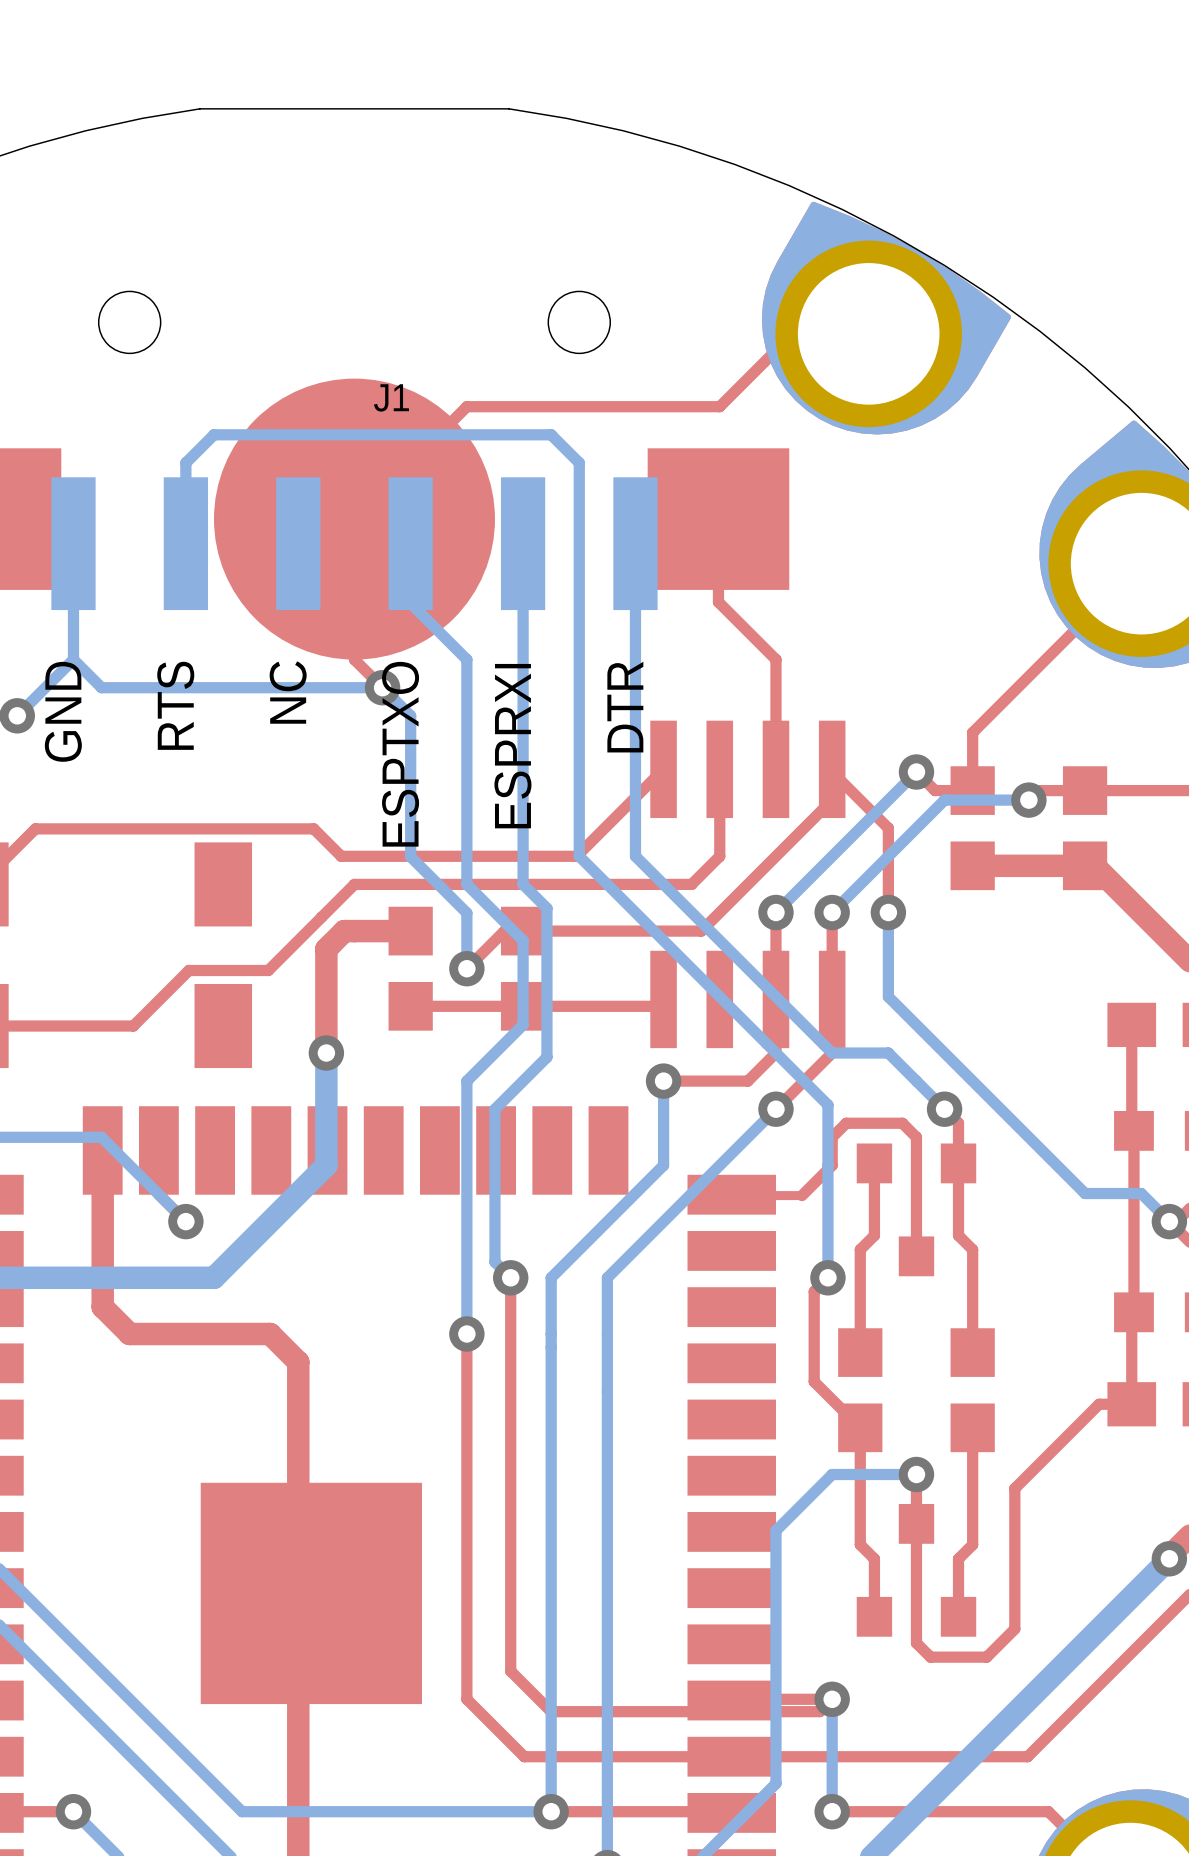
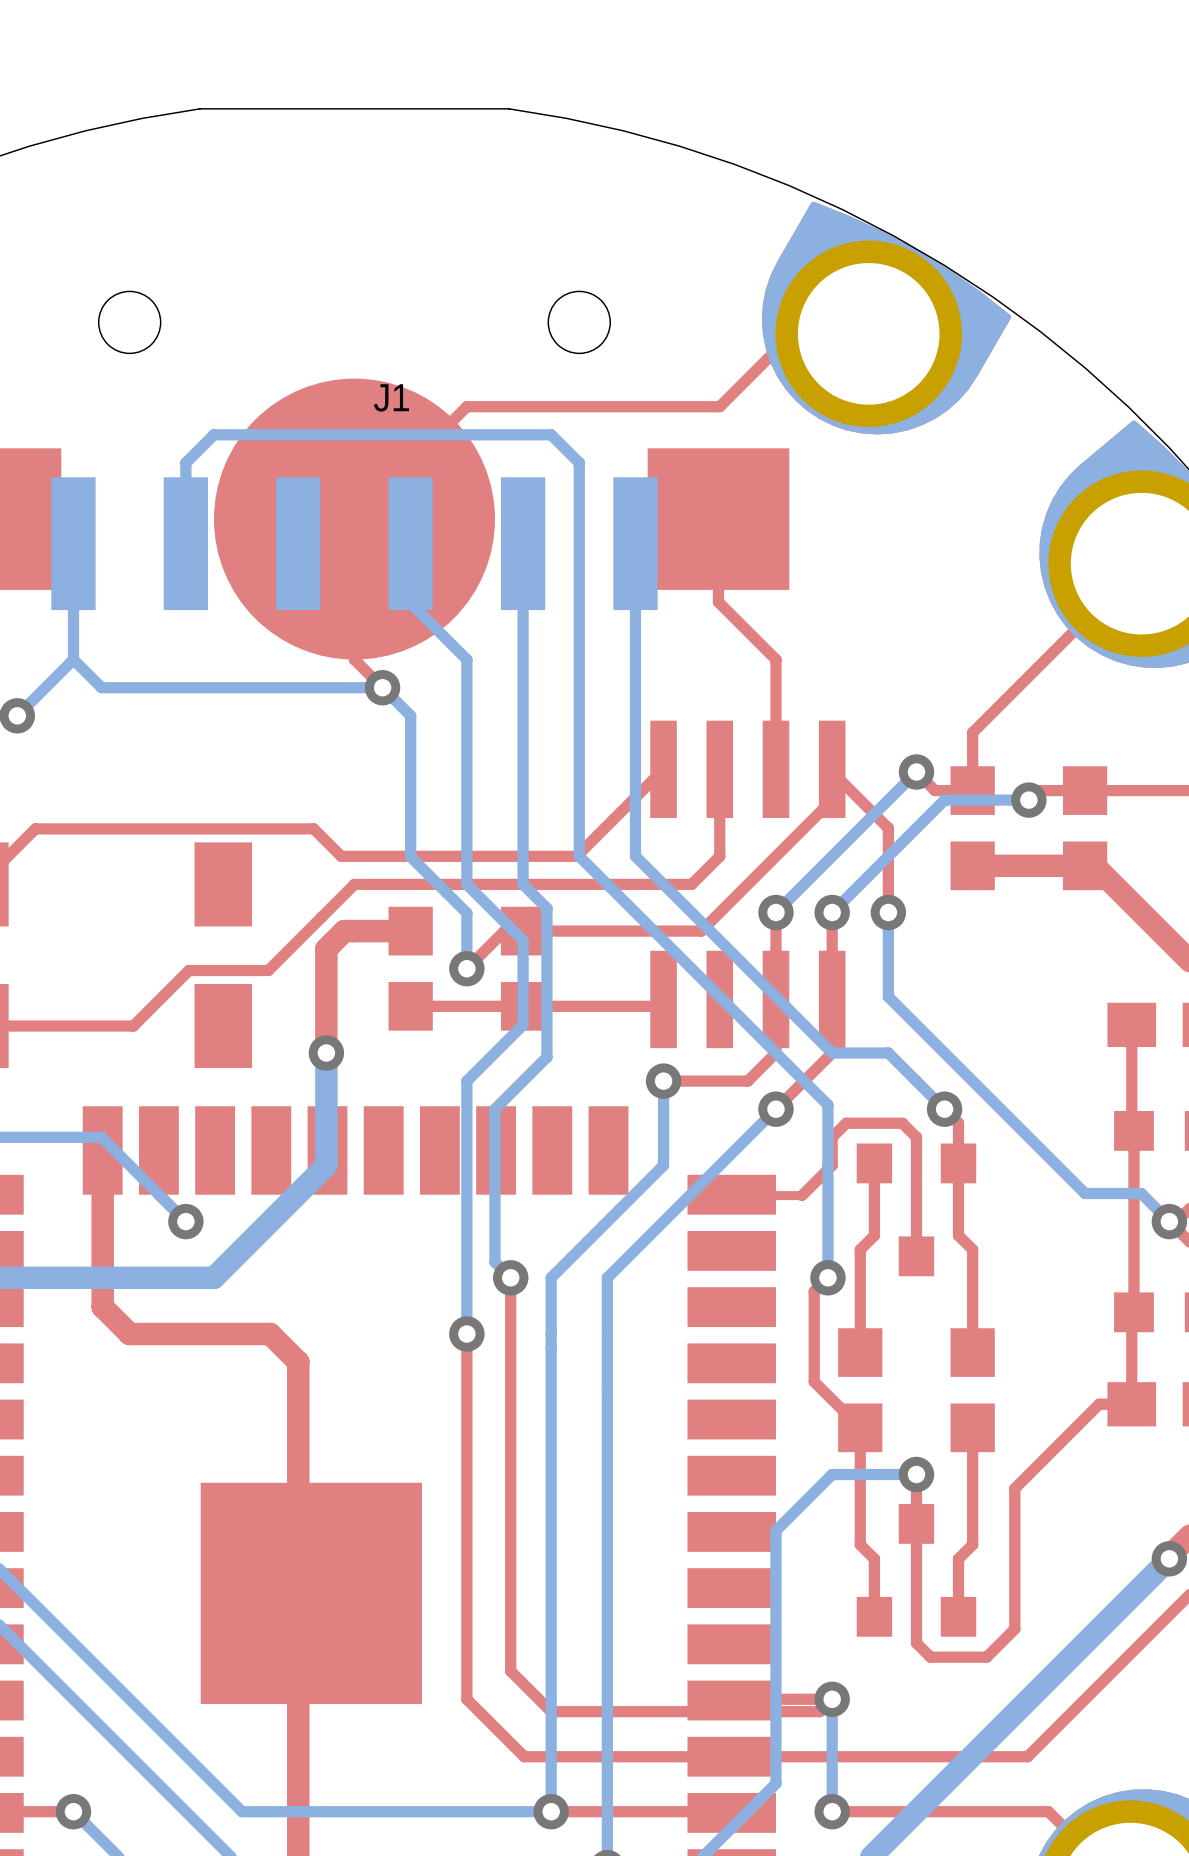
text: NC (288, 692) -> none
text: RTS (175, 705) -> none
text: DTR (625, 707) -> none
text: GND (63, 711) -> none
text: ESPRXI (512, 746) -> none
text: ESPTXO (400, 754) -> none

